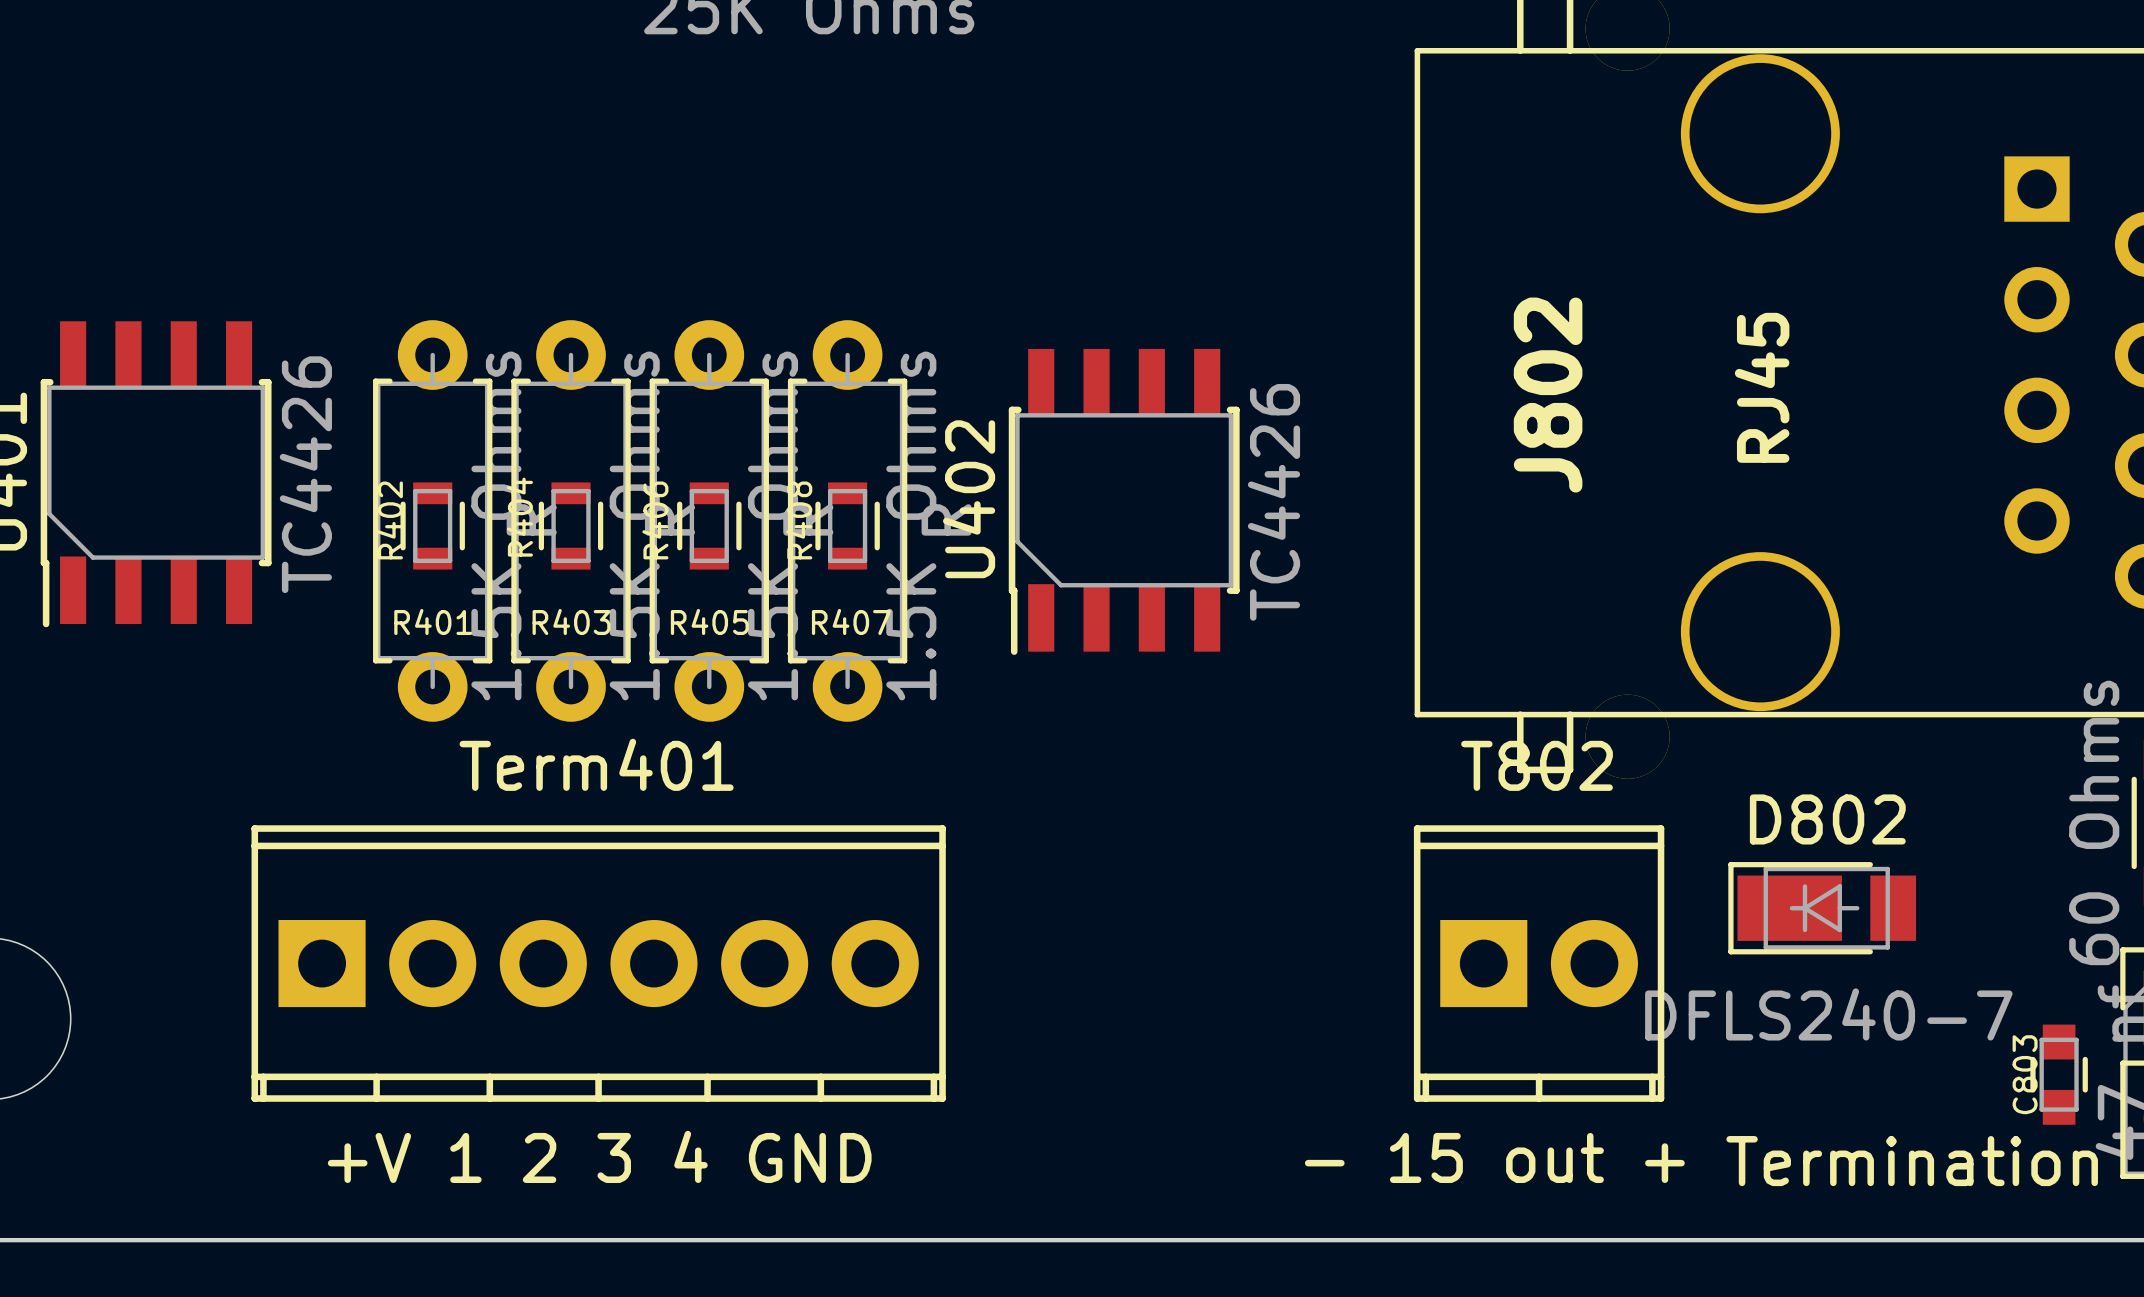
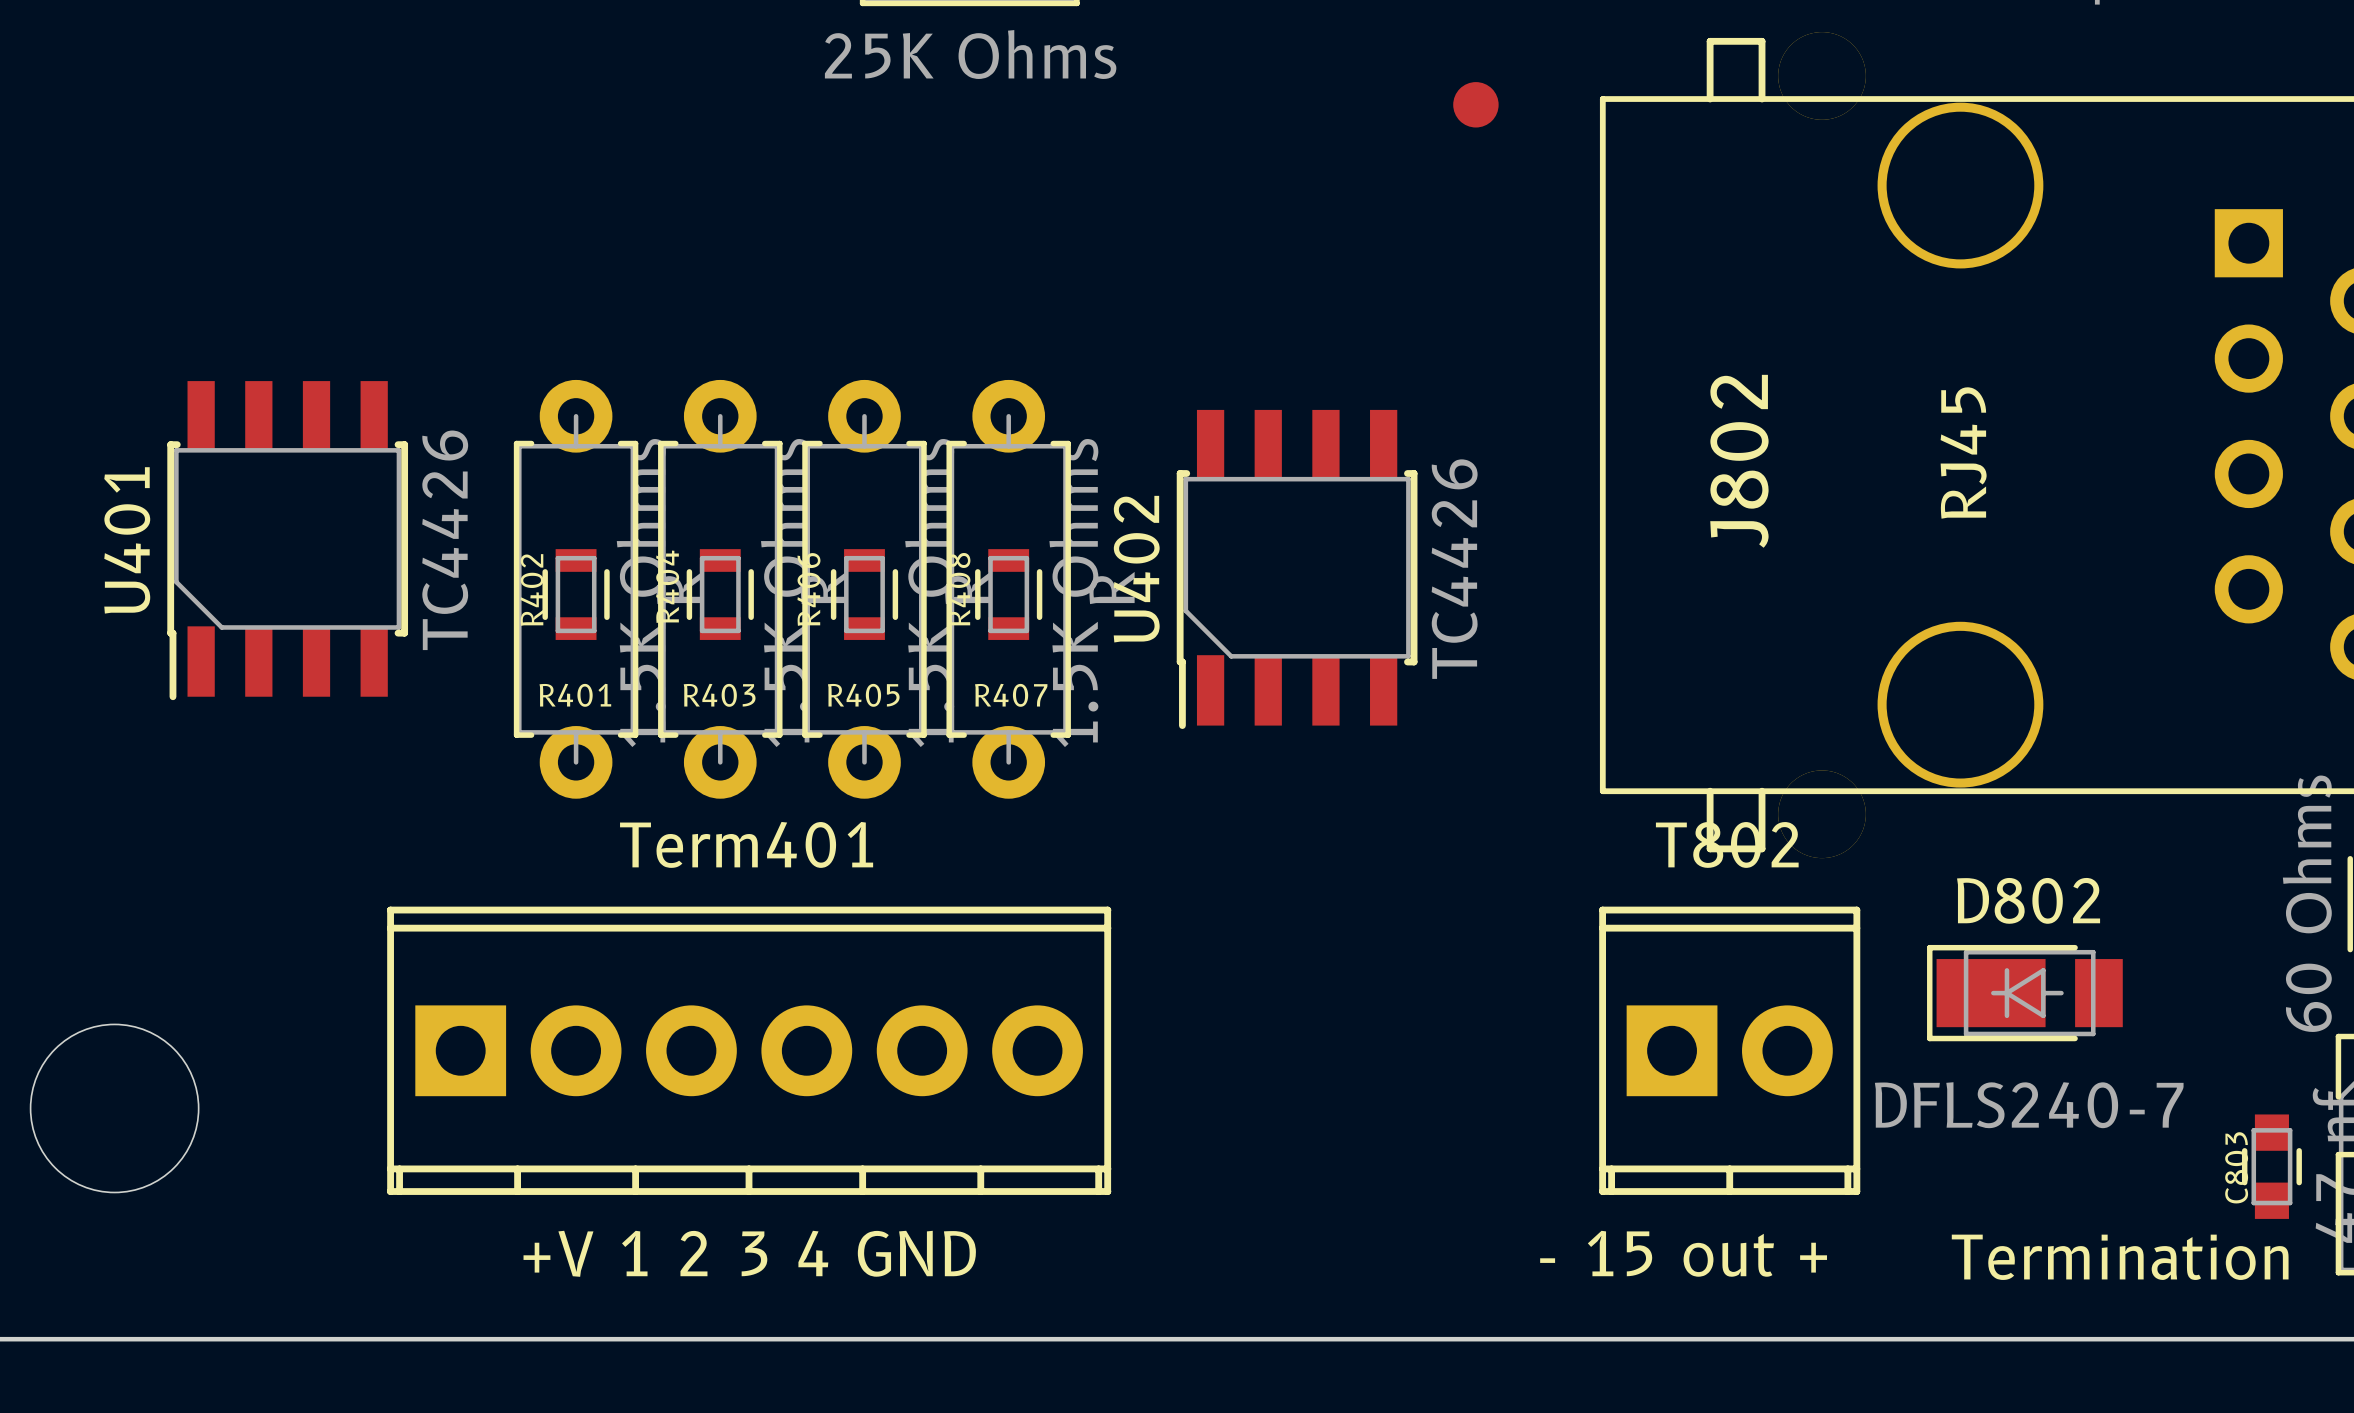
part: none -> (1475, 104)

